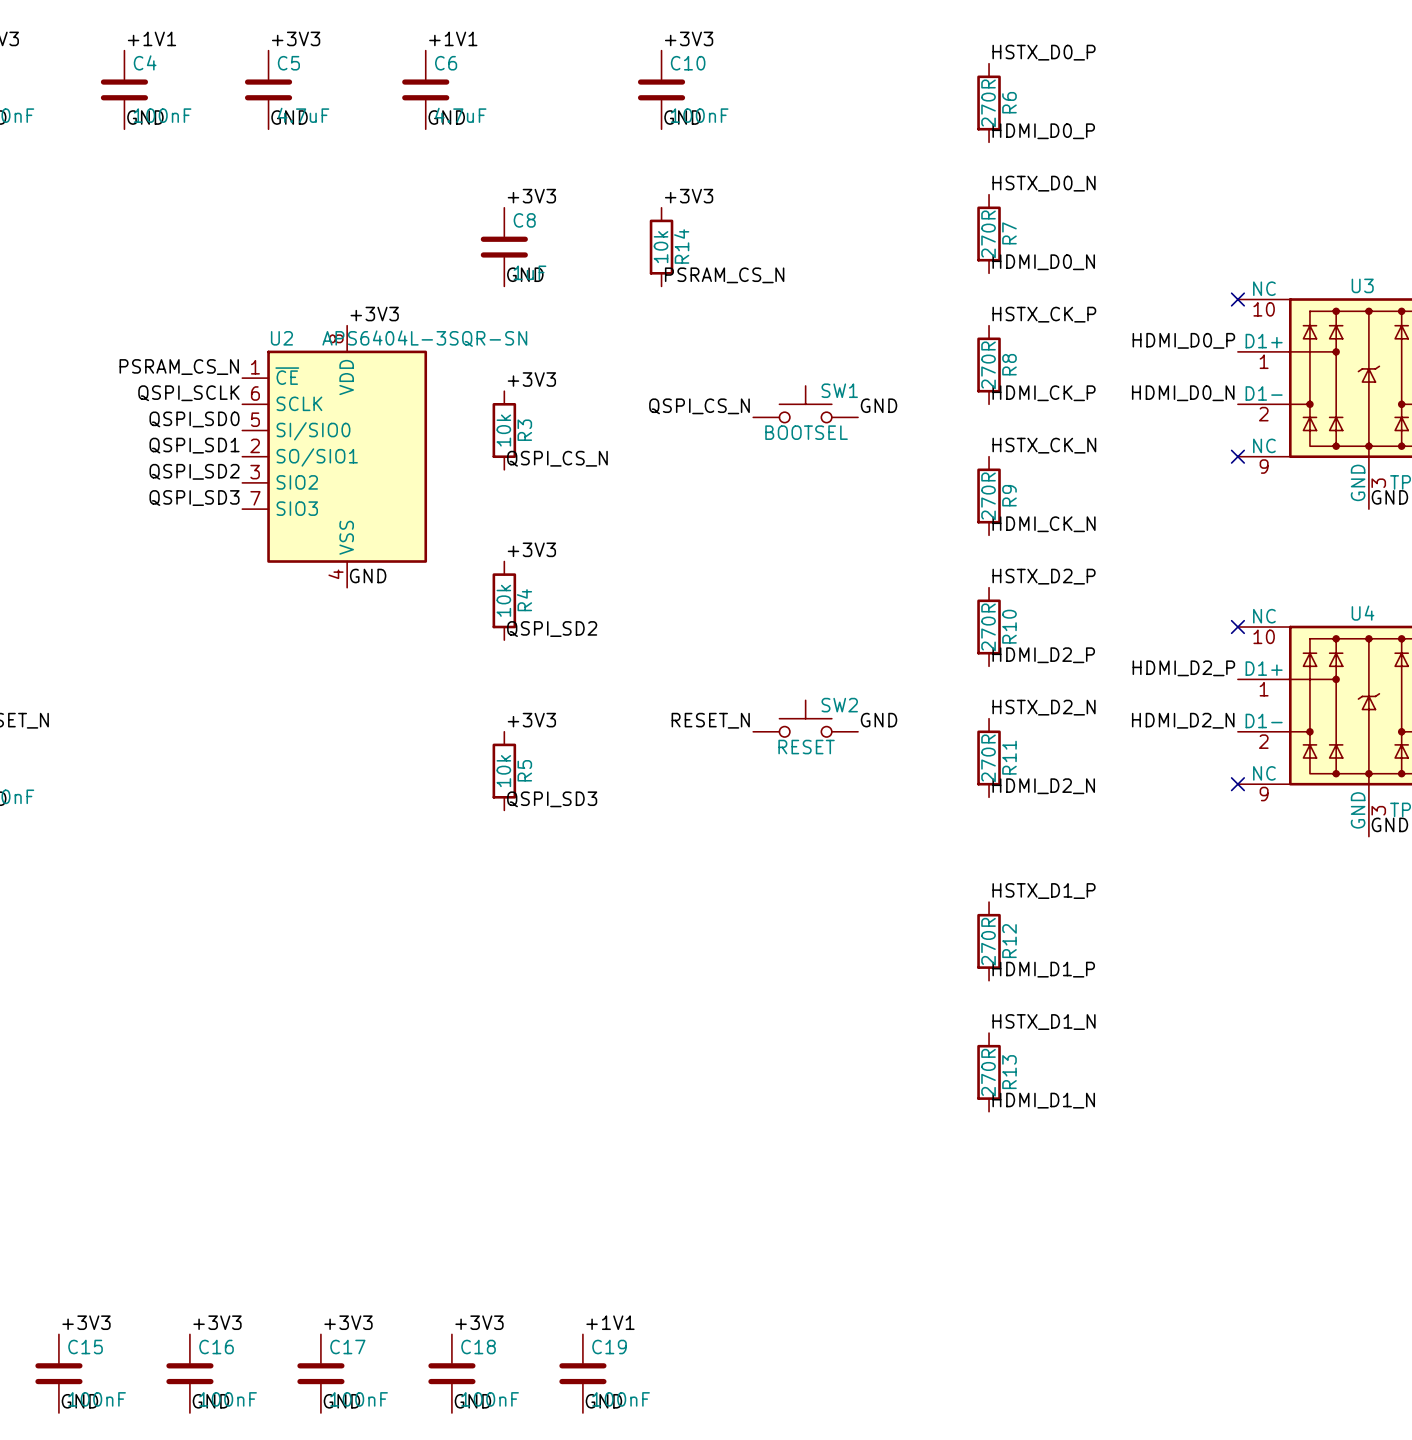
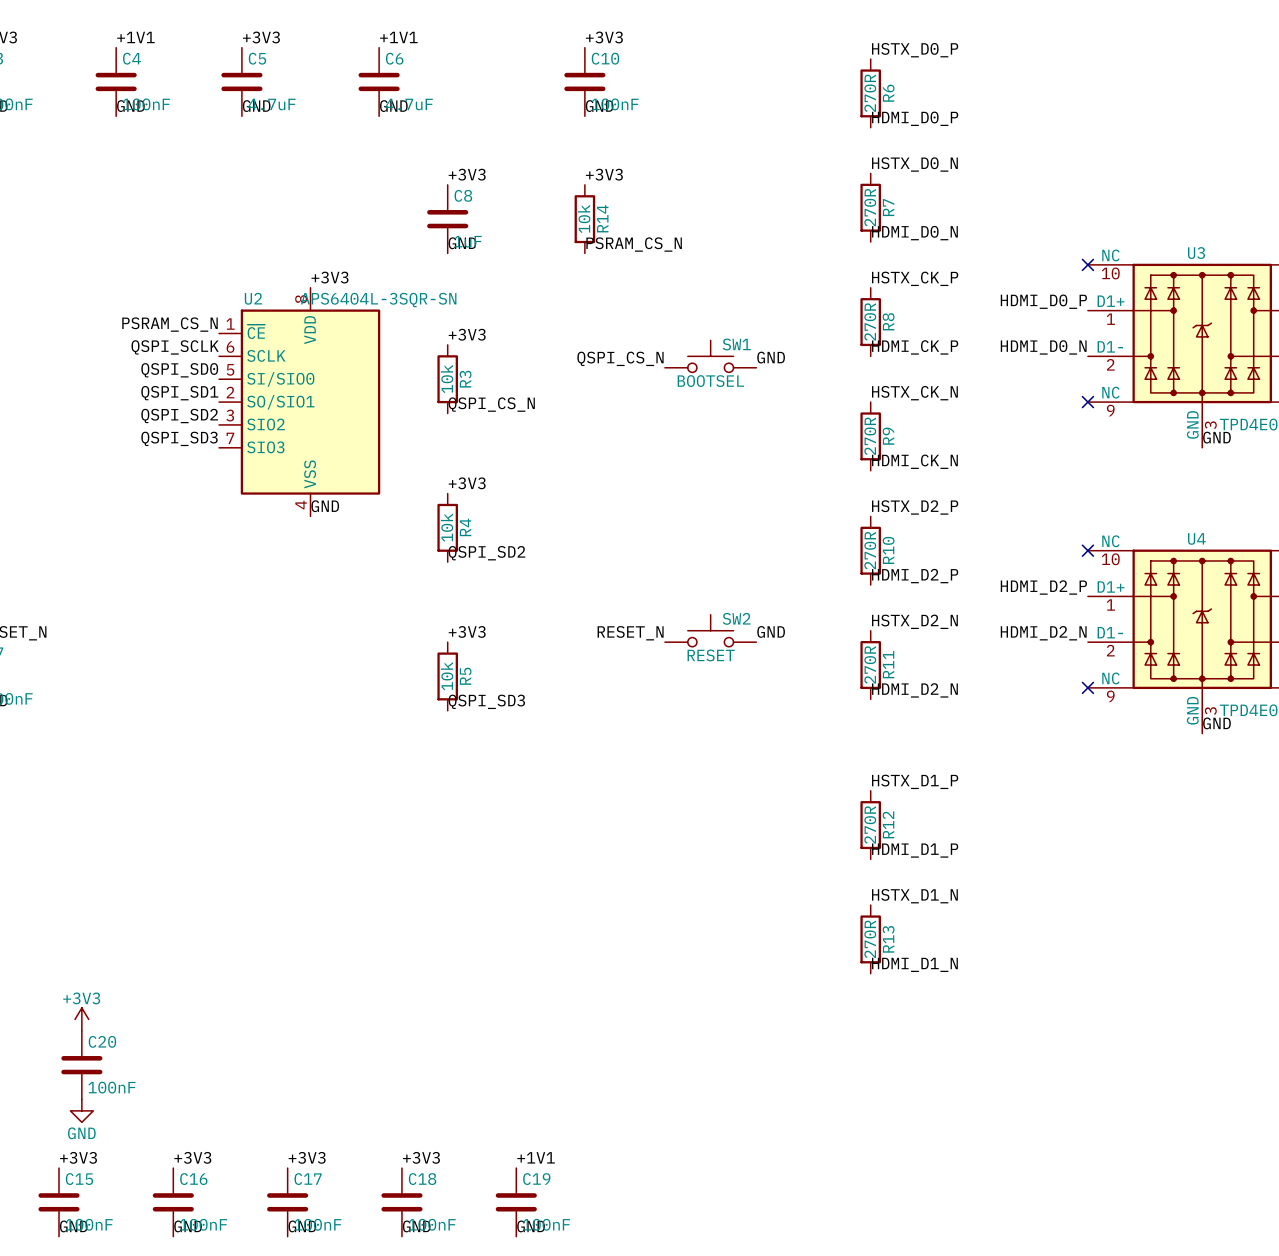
power symbol: none -> +3V3 (81, 1019)
C20: none -> 100nF (81, 1065)
power symbol: none -> GND (81, 1110)

